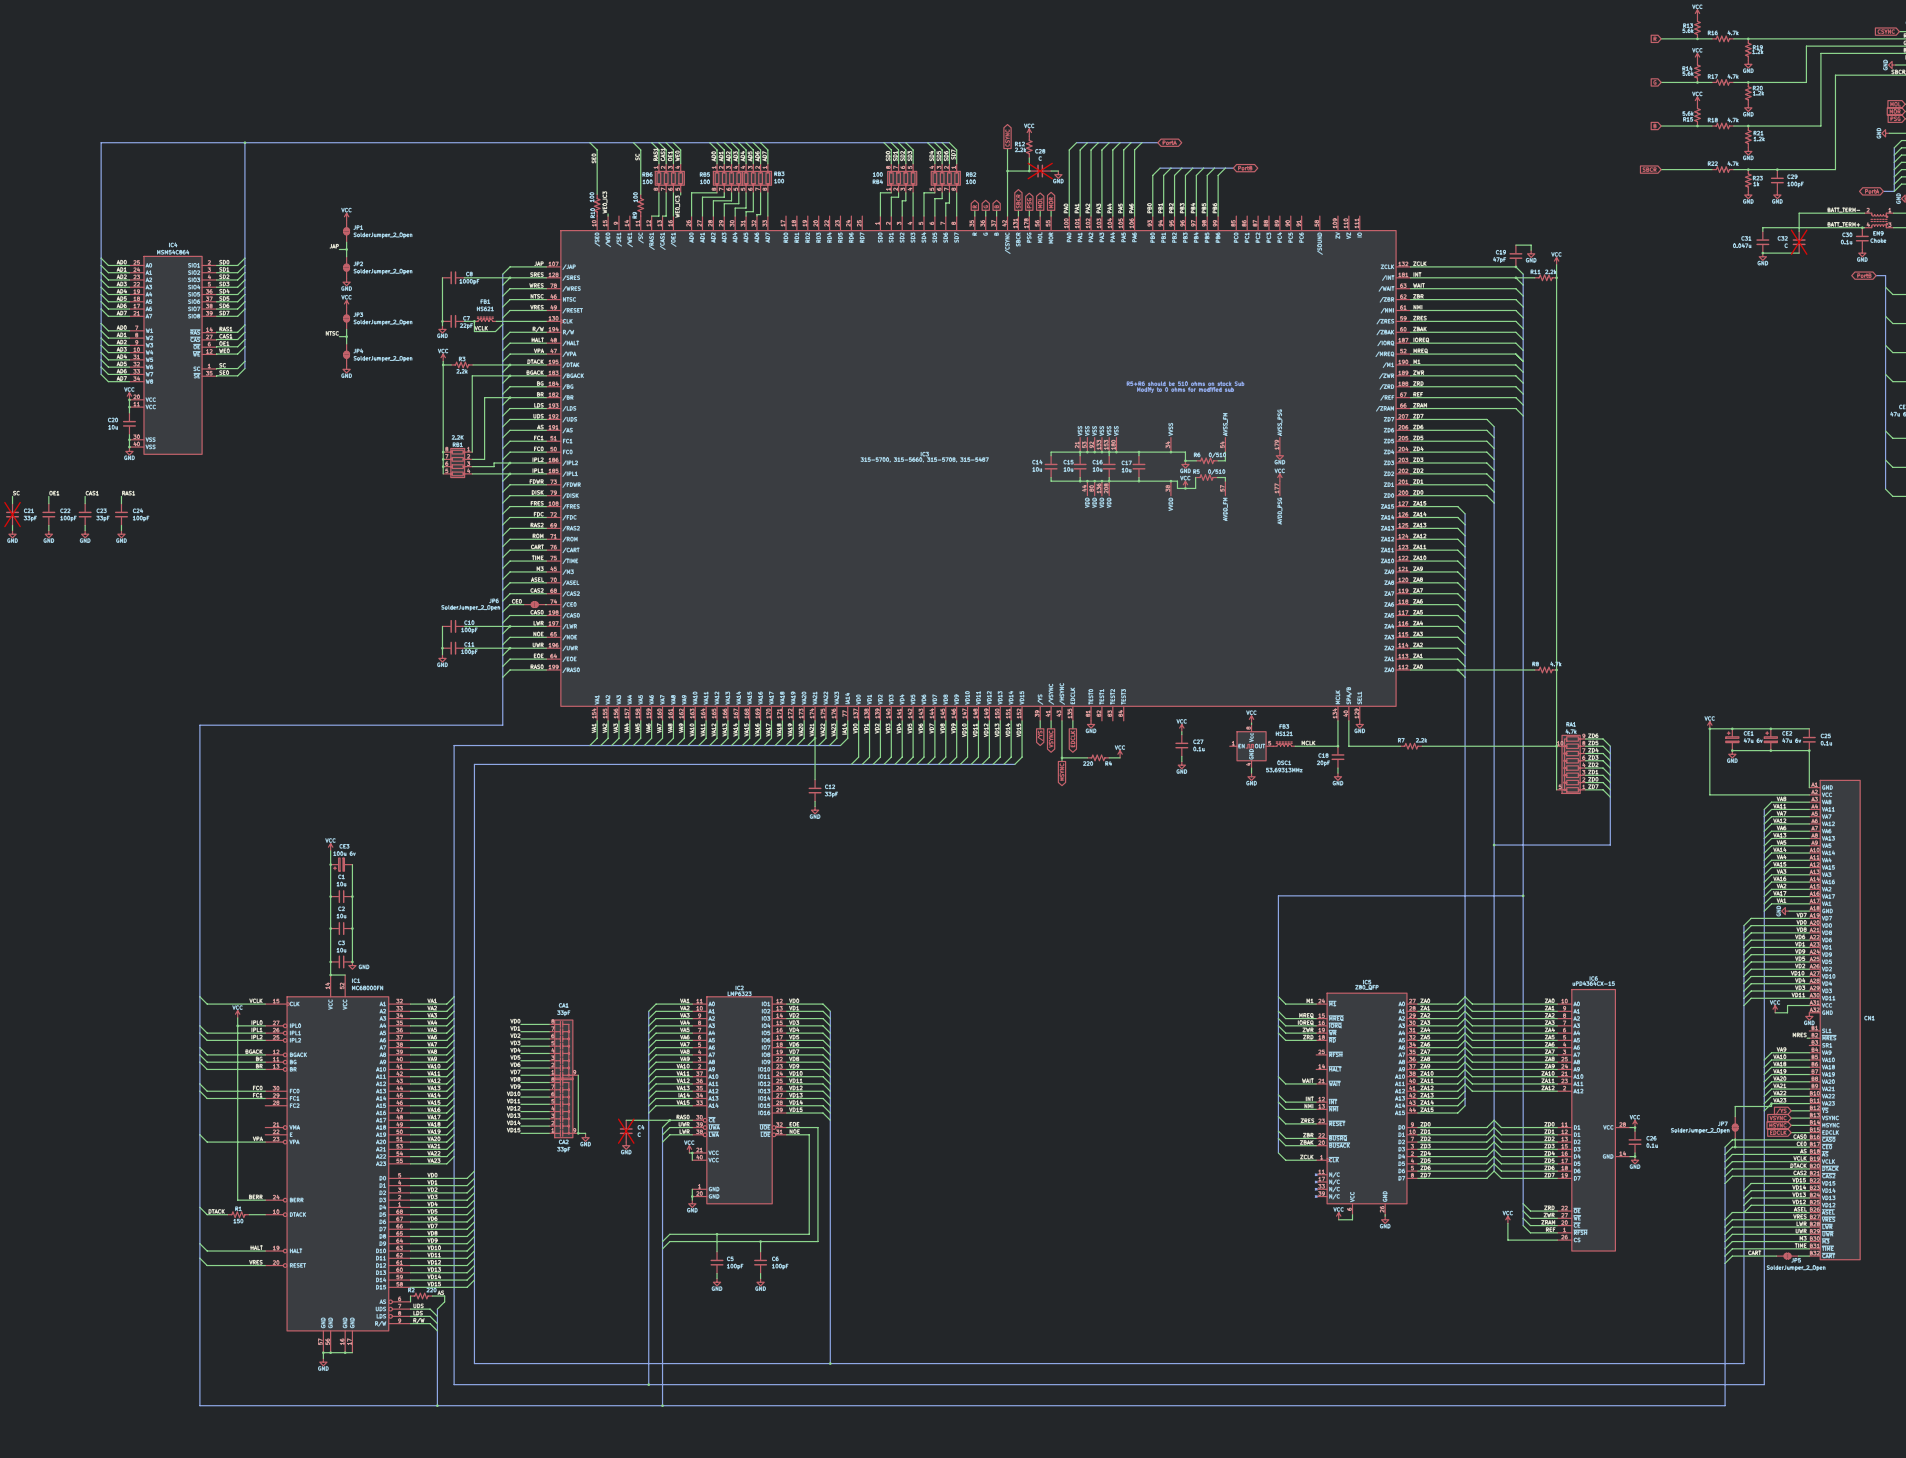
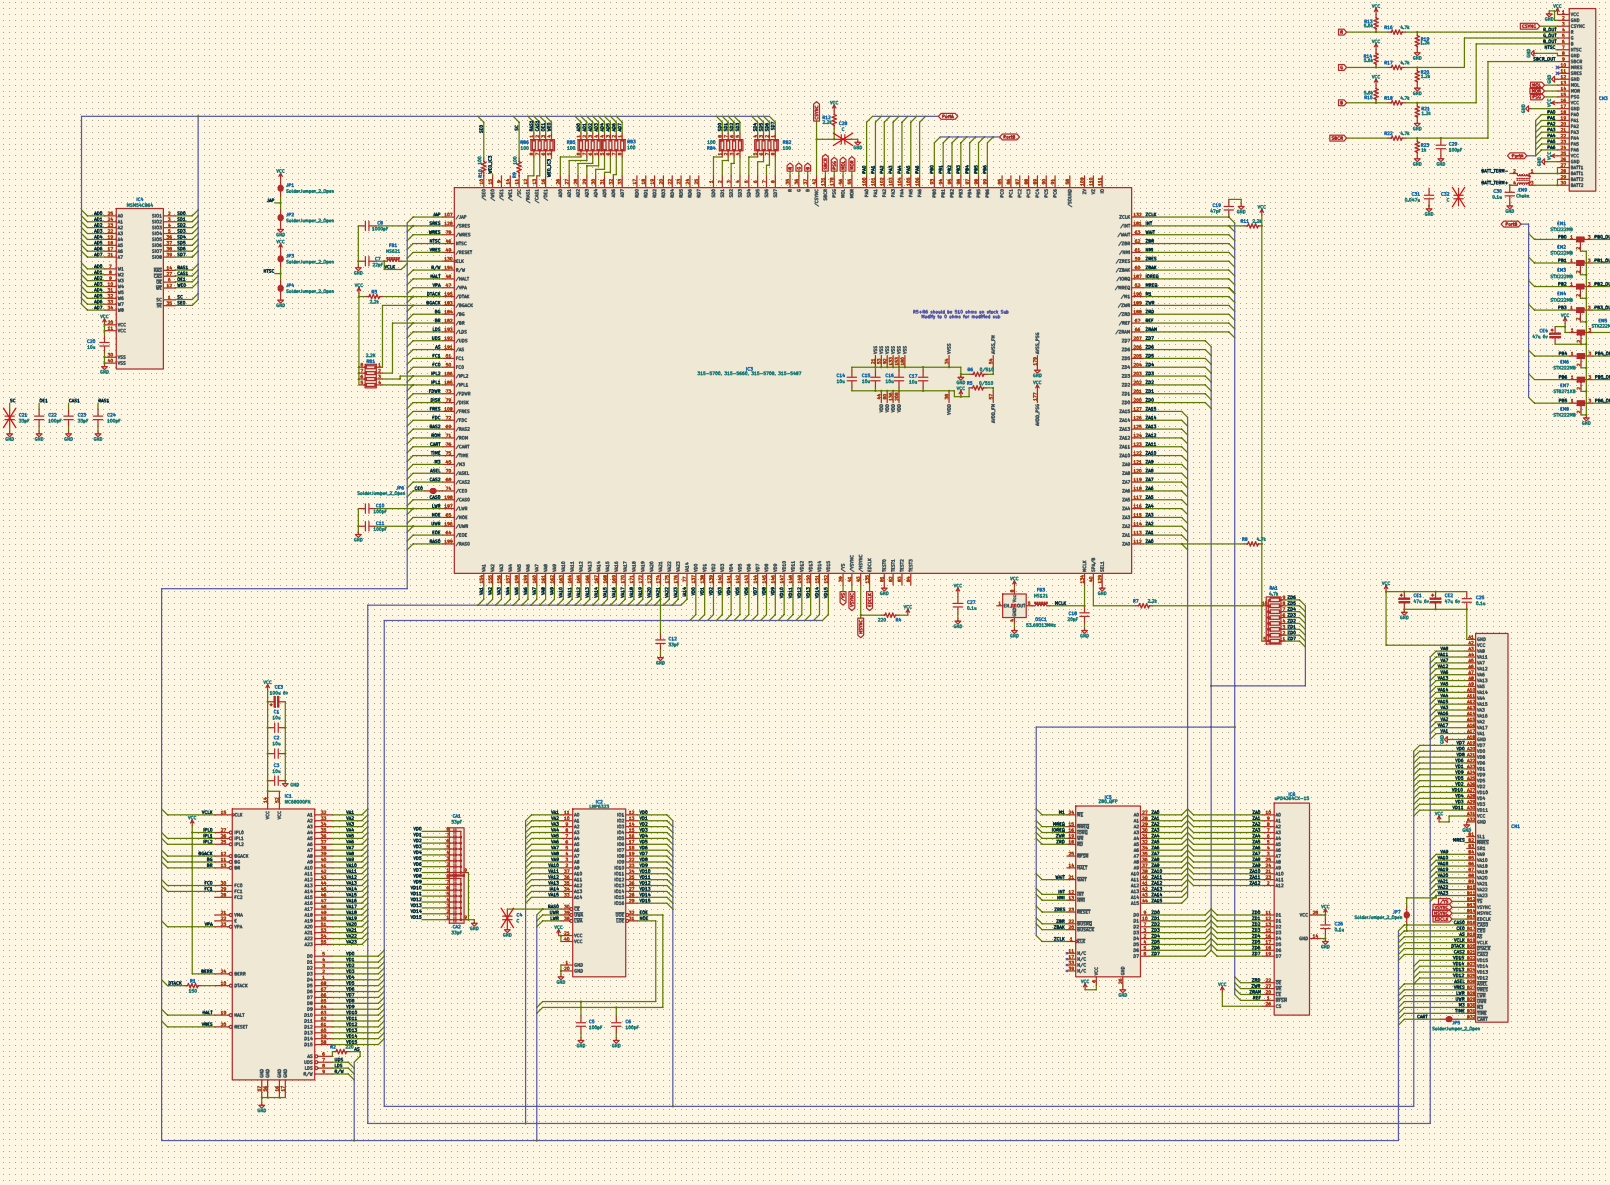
wire: (1862, 213) (1799, 213) (1799, 231) -> none
wire: (1862, 227) (1762, 227) (1762, 231) -> none
wire: (1762, 253) (1799, 253) -> none

